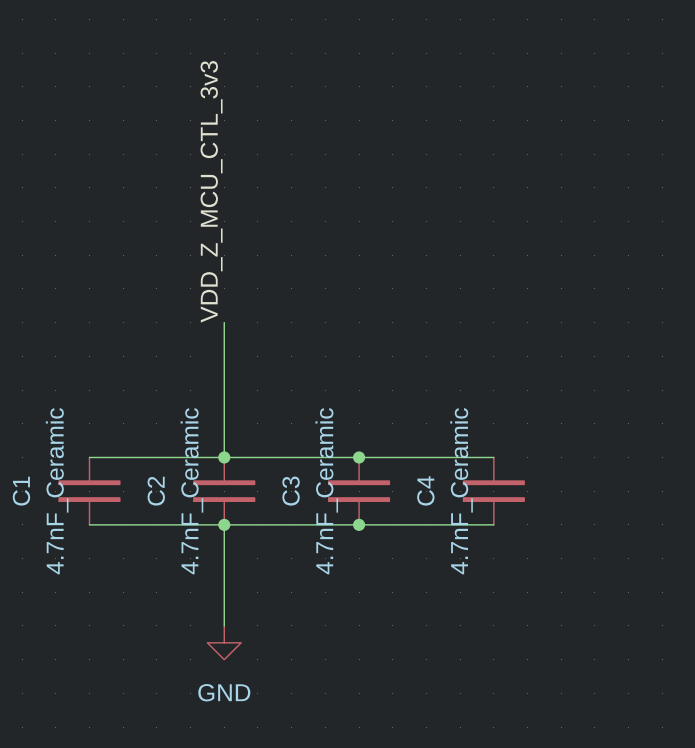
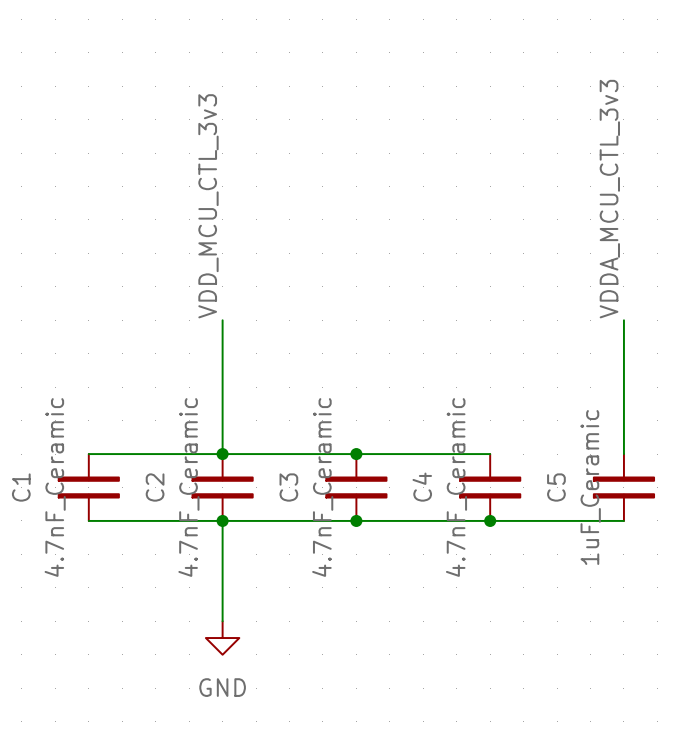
label: VDD_Z_MCU_CTL_3v3 (211, 191) -> VDD_MCU_CTL_3v3 (208, 206)
label: none -> VDDA_MCU_CTL_3v3 (609, 199)
wire: none -> (623, 320) (623, 454)
C5: none -> 1uF_Ceramic (623, 487)
wire: none -> (490, 520) (623, 520)
junction: none -> (490, 520)

